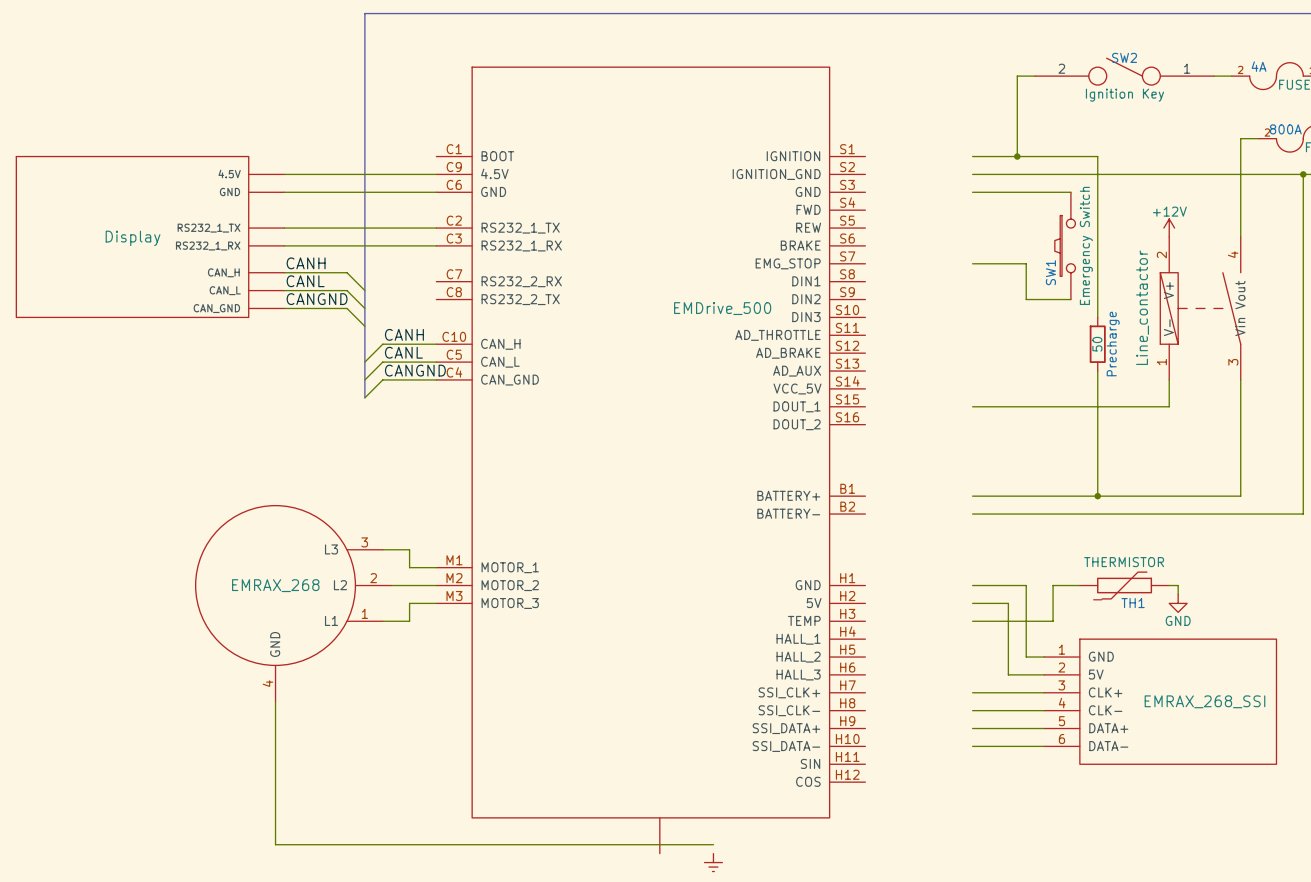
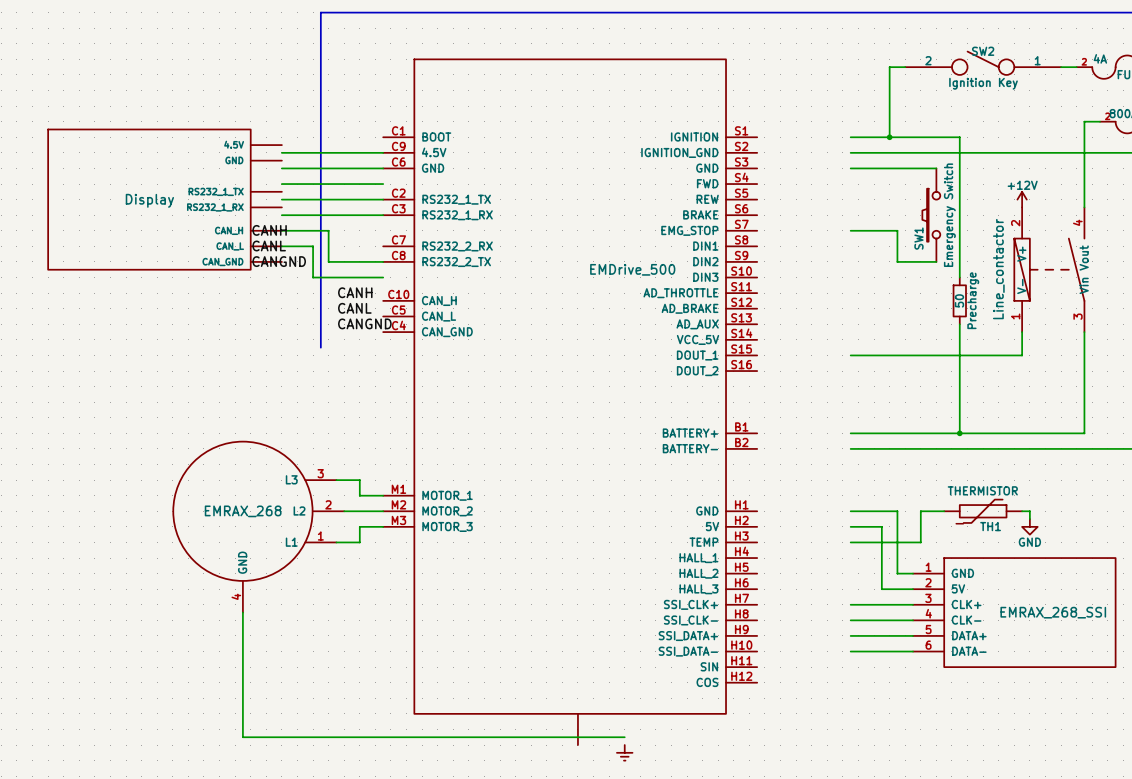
wire: (284, 174) (320, 174) -> none
wire: (284, 192) (320, 192) -> none
wire: none -> (281, 184) (383, 184)
wire: (284, 228) (320, 228) -> none
part position: (150, 236) -> (165, 199)
wire: (284, 245) (320, 245) -> none
wire: none -> (281, 230) (328, 230) (328, 261) (383, 261)
wire: (284, 272) (347, 272) (364, 290) -> none
wire: none -> (281, 246) (313, 246) (313, 277) (383, 277)
wire: (284, 290) (347, 290) (364, 308) -> none
wire: (284, 308) (347, 308) (364, 326) -> none
wire: (436, 344) (382, 344) (364, 362) -> none
wire: (436, 362) (382, 362) (364, 379) -> none
wire: (436, 379) (382, 379) (364, 397) -> none

